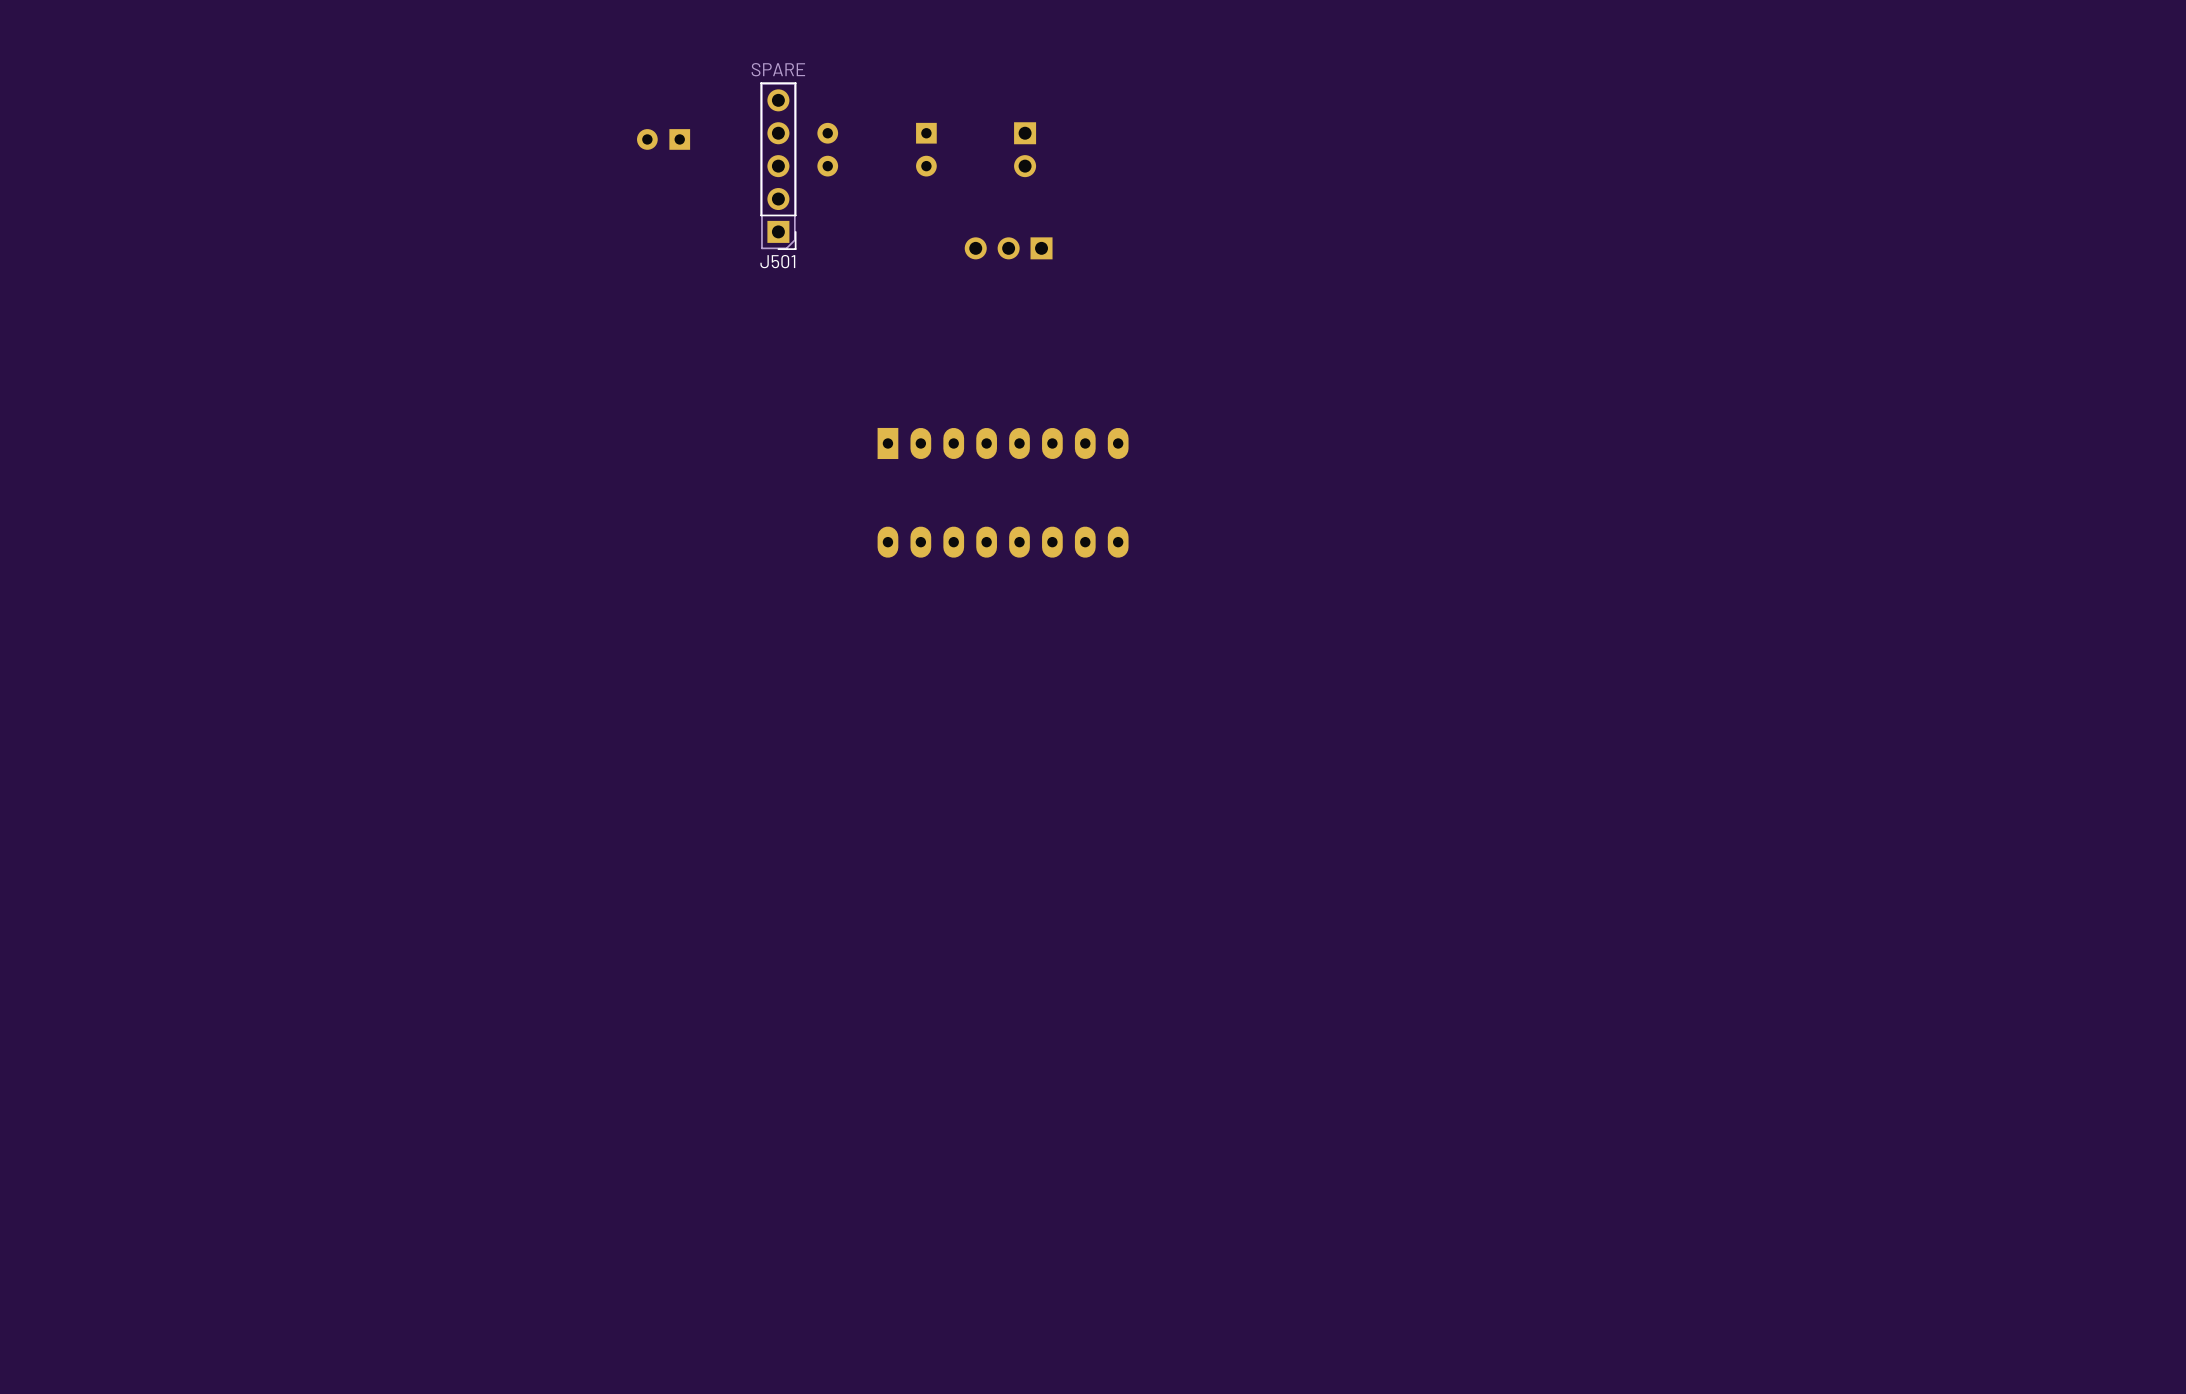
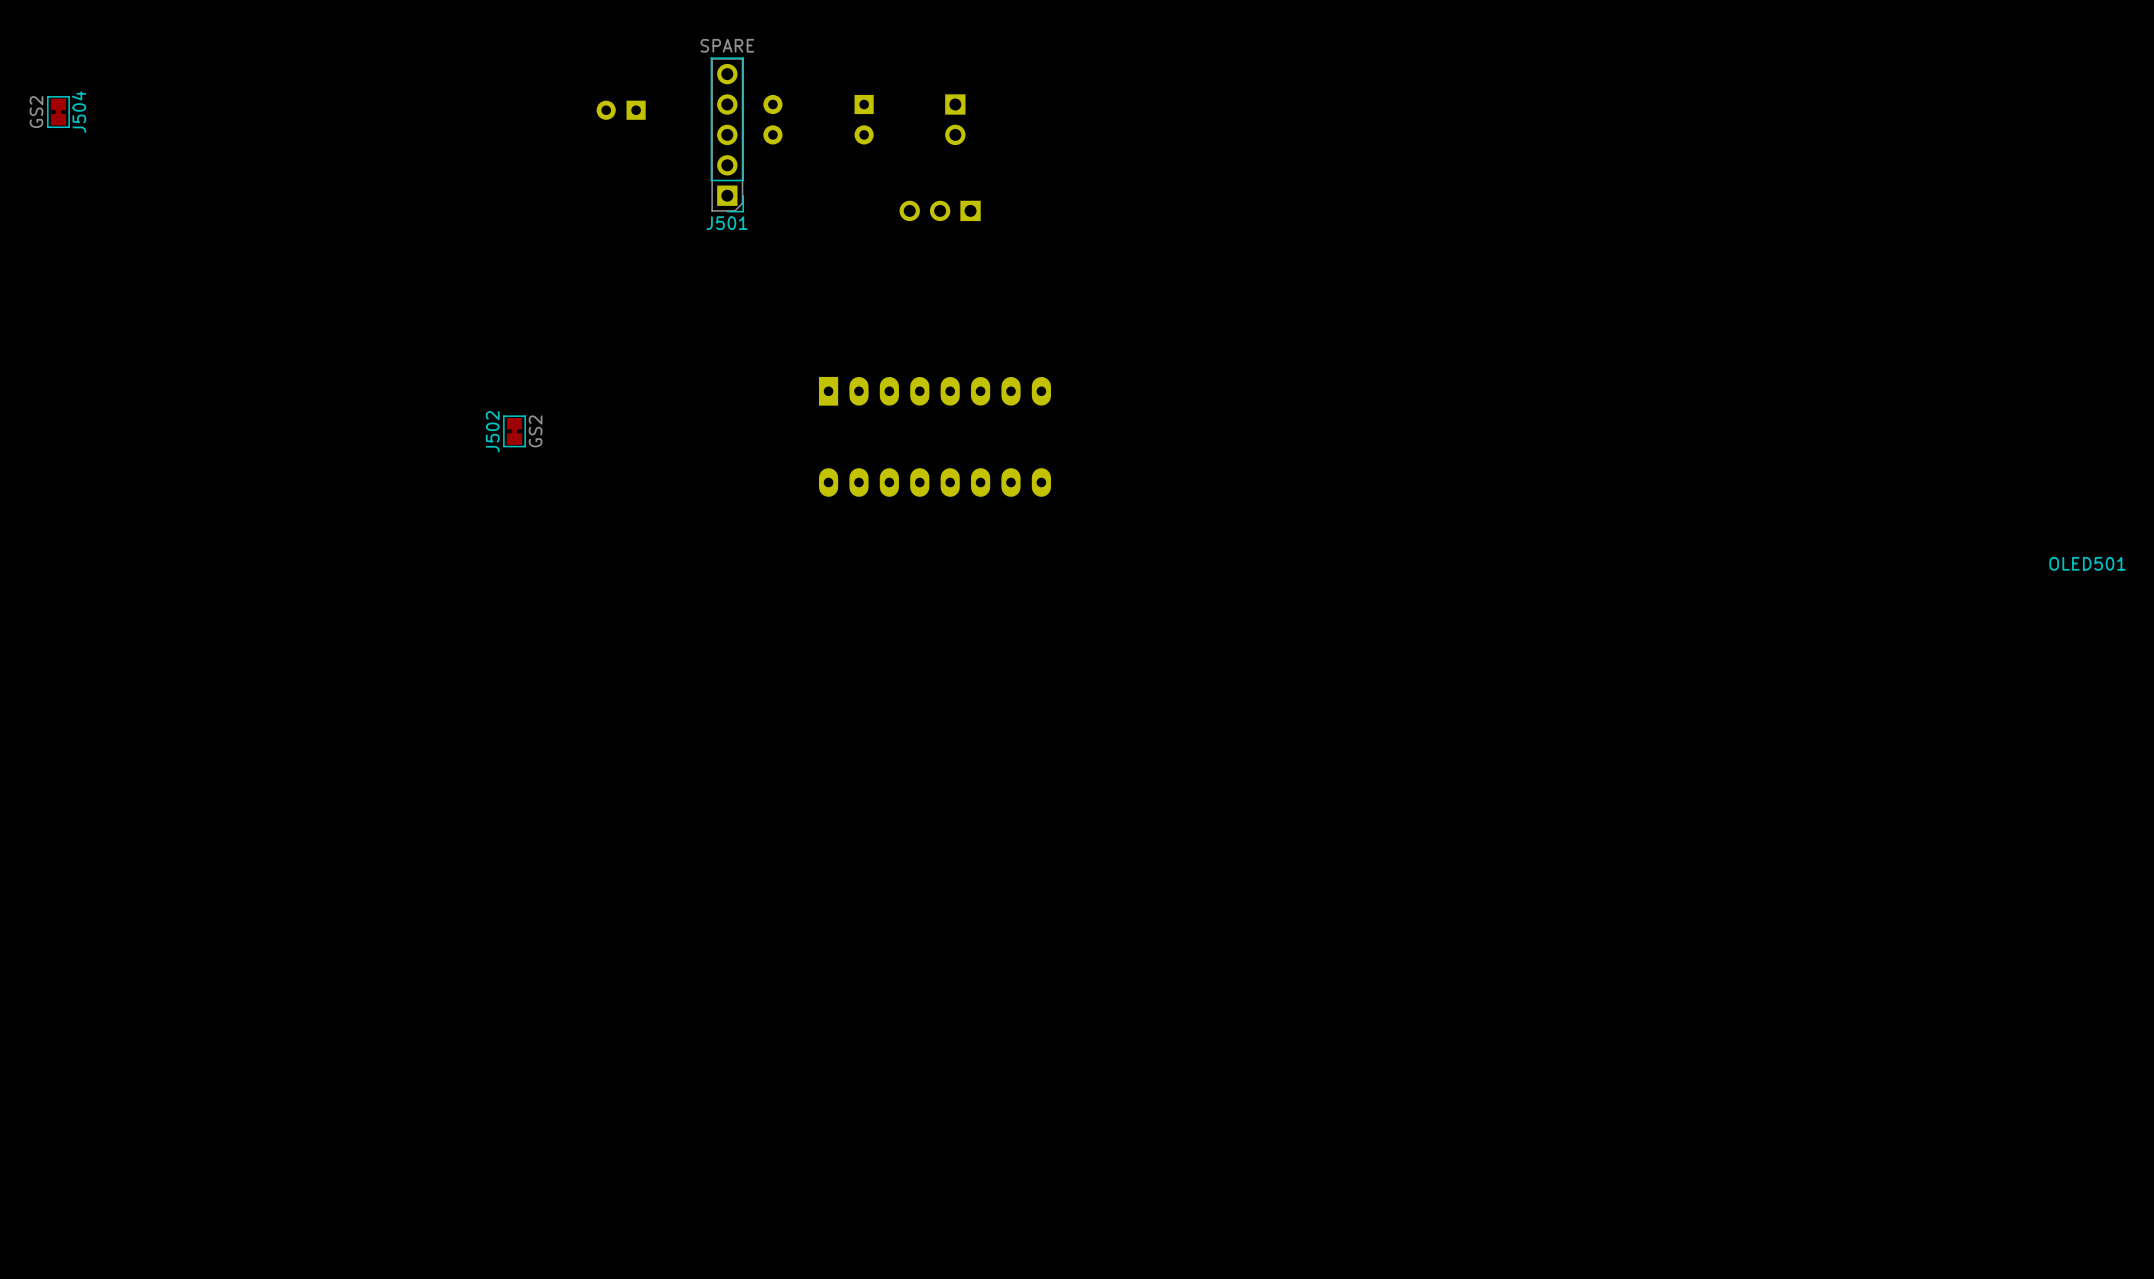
J504: none -> GS2 (58, 112)
J502: none -> GS2 (514, 431)

